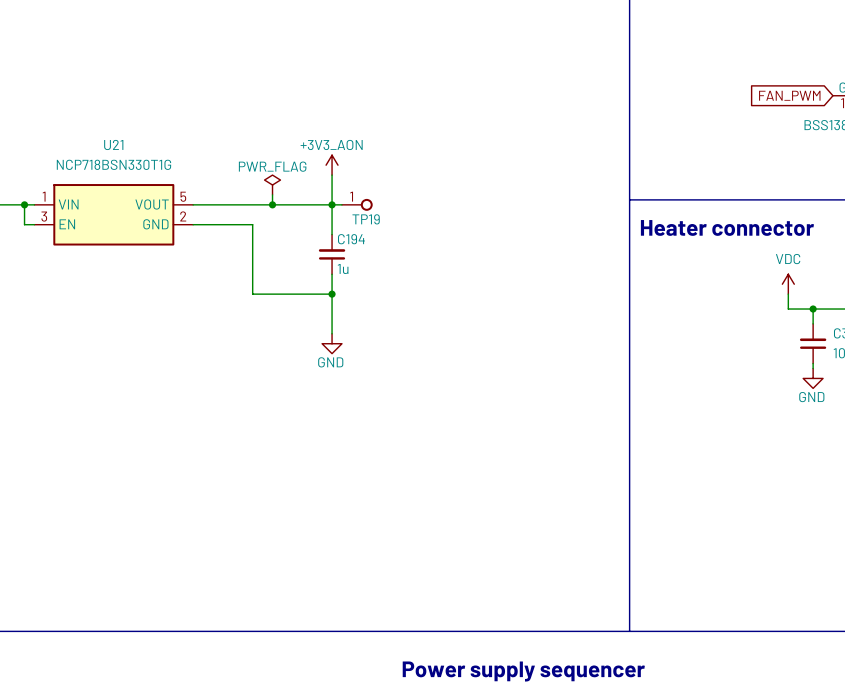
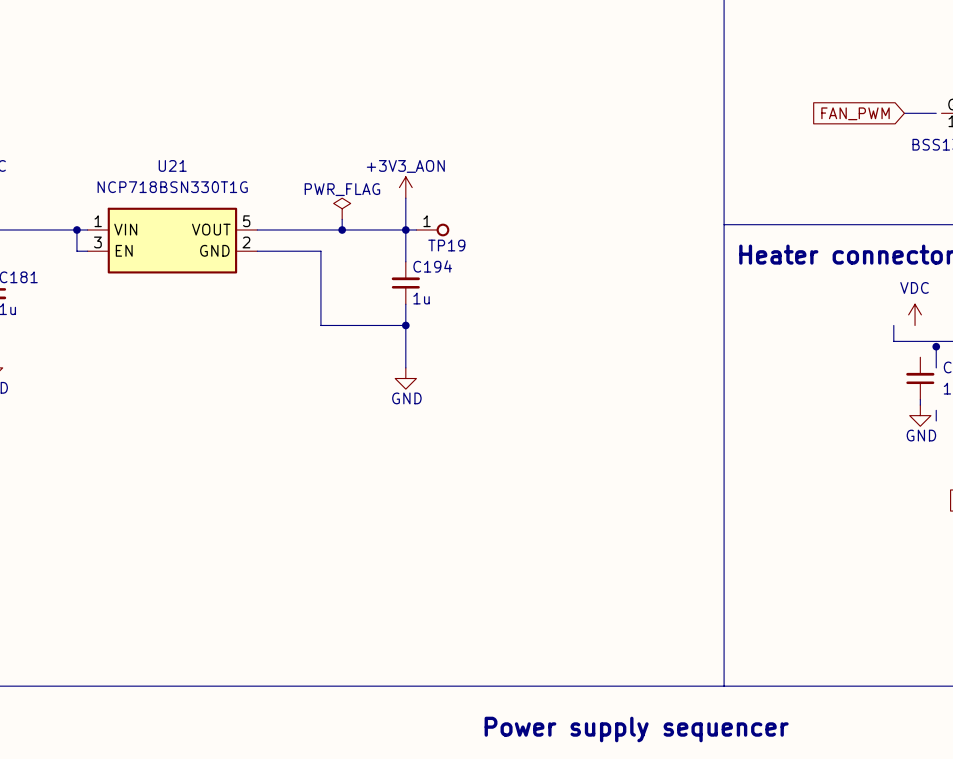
global label position: FAN_PWM (789, 95) -> FAN_PWM (855, 113)
wire: none -> (904, 113) (936, 113)
power symbol position: VDC (788, 284) -> VDC (915, 314)
wire: (813, 309) (813, 323) -> none
junction position: (813, 309) -> (936, 346)
wire: none -> (936, 346) (936, 367)
wire: none -> (936, 410) (936, 420)

